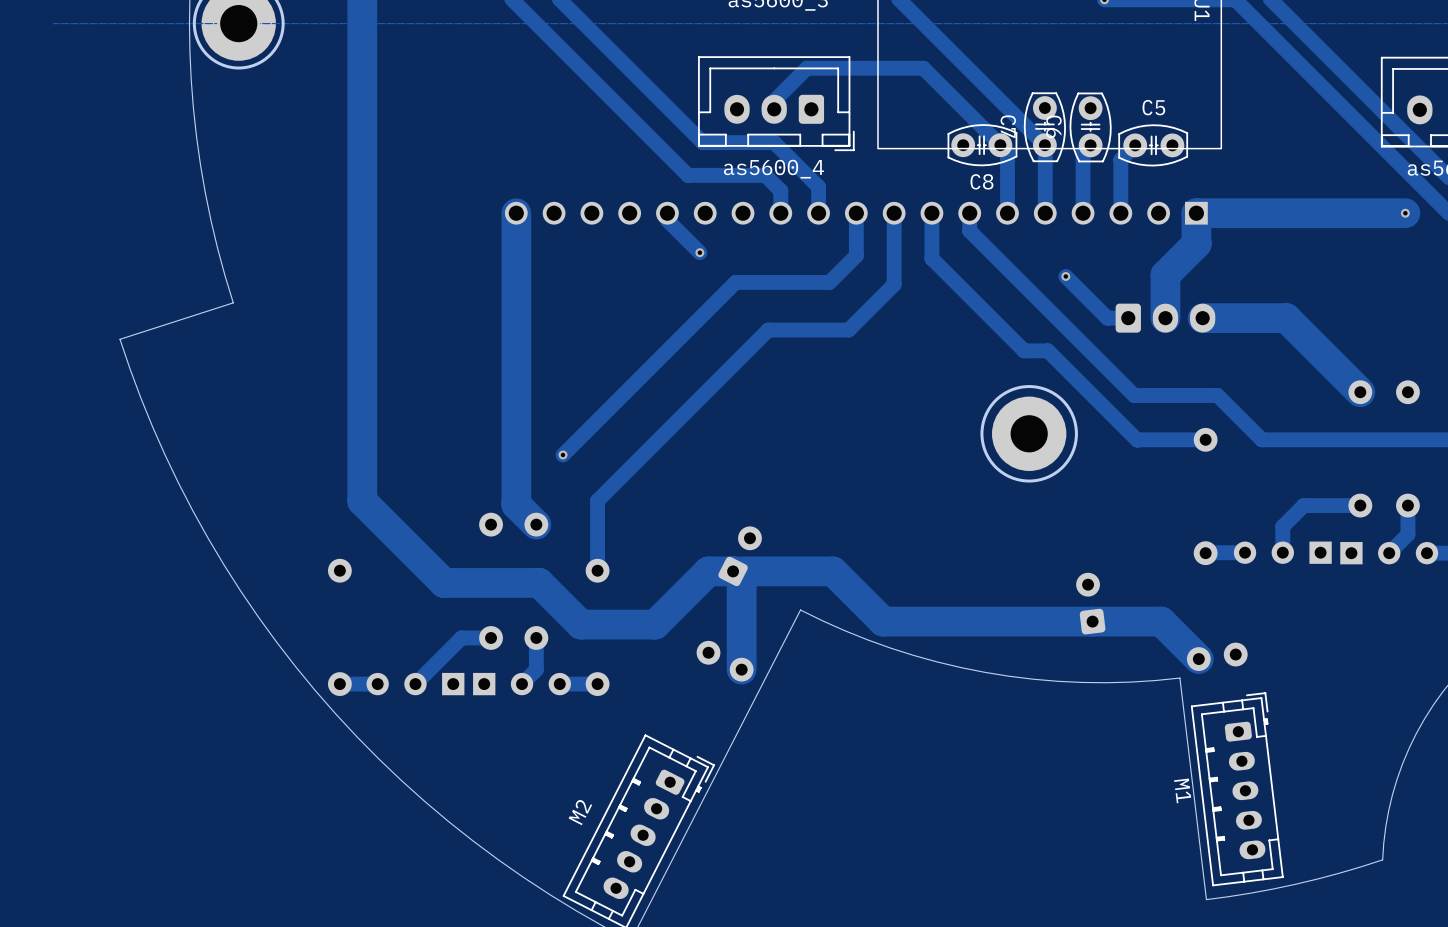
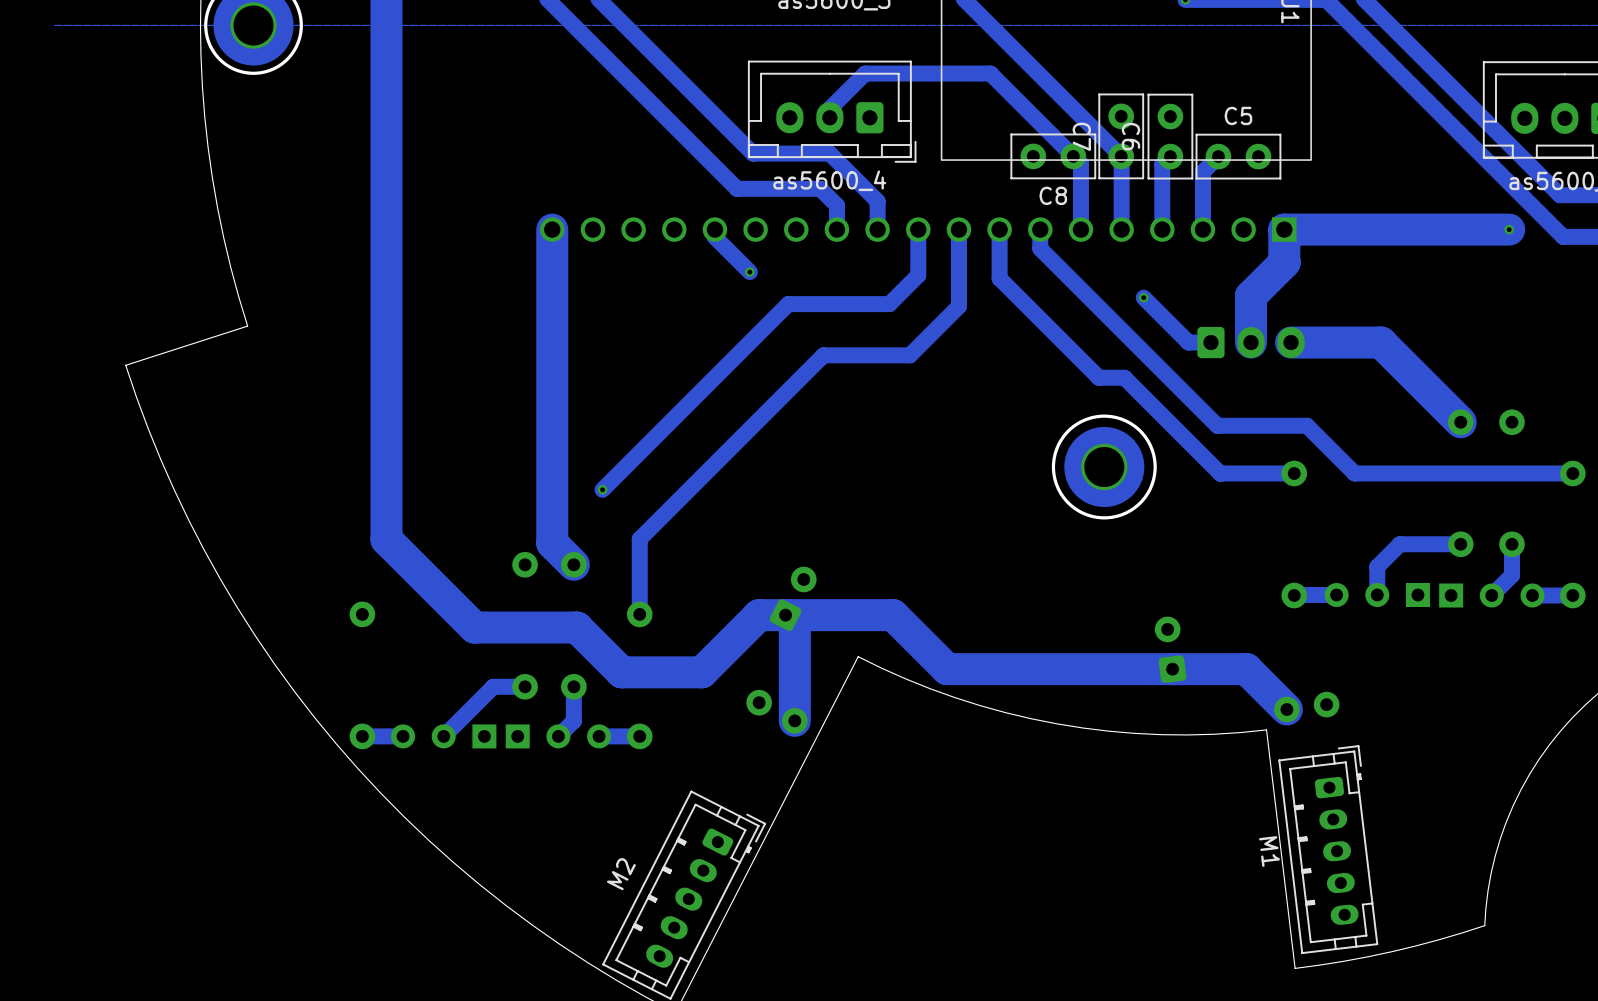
C7 footprint: [1023, 92, 1066, 163] -> [1098, 93, 1145, 180]
C6 footprint: [1069, 92, 1112, 163] -> [1147, 93, 1194, 180]
C8 footprint: [947, 124, 1018, 167] -> [1010, 133, 1097, 180]
C5 footprint: [1118, 124, 1189, 167] -> [1195, 133, 1282, 180]

